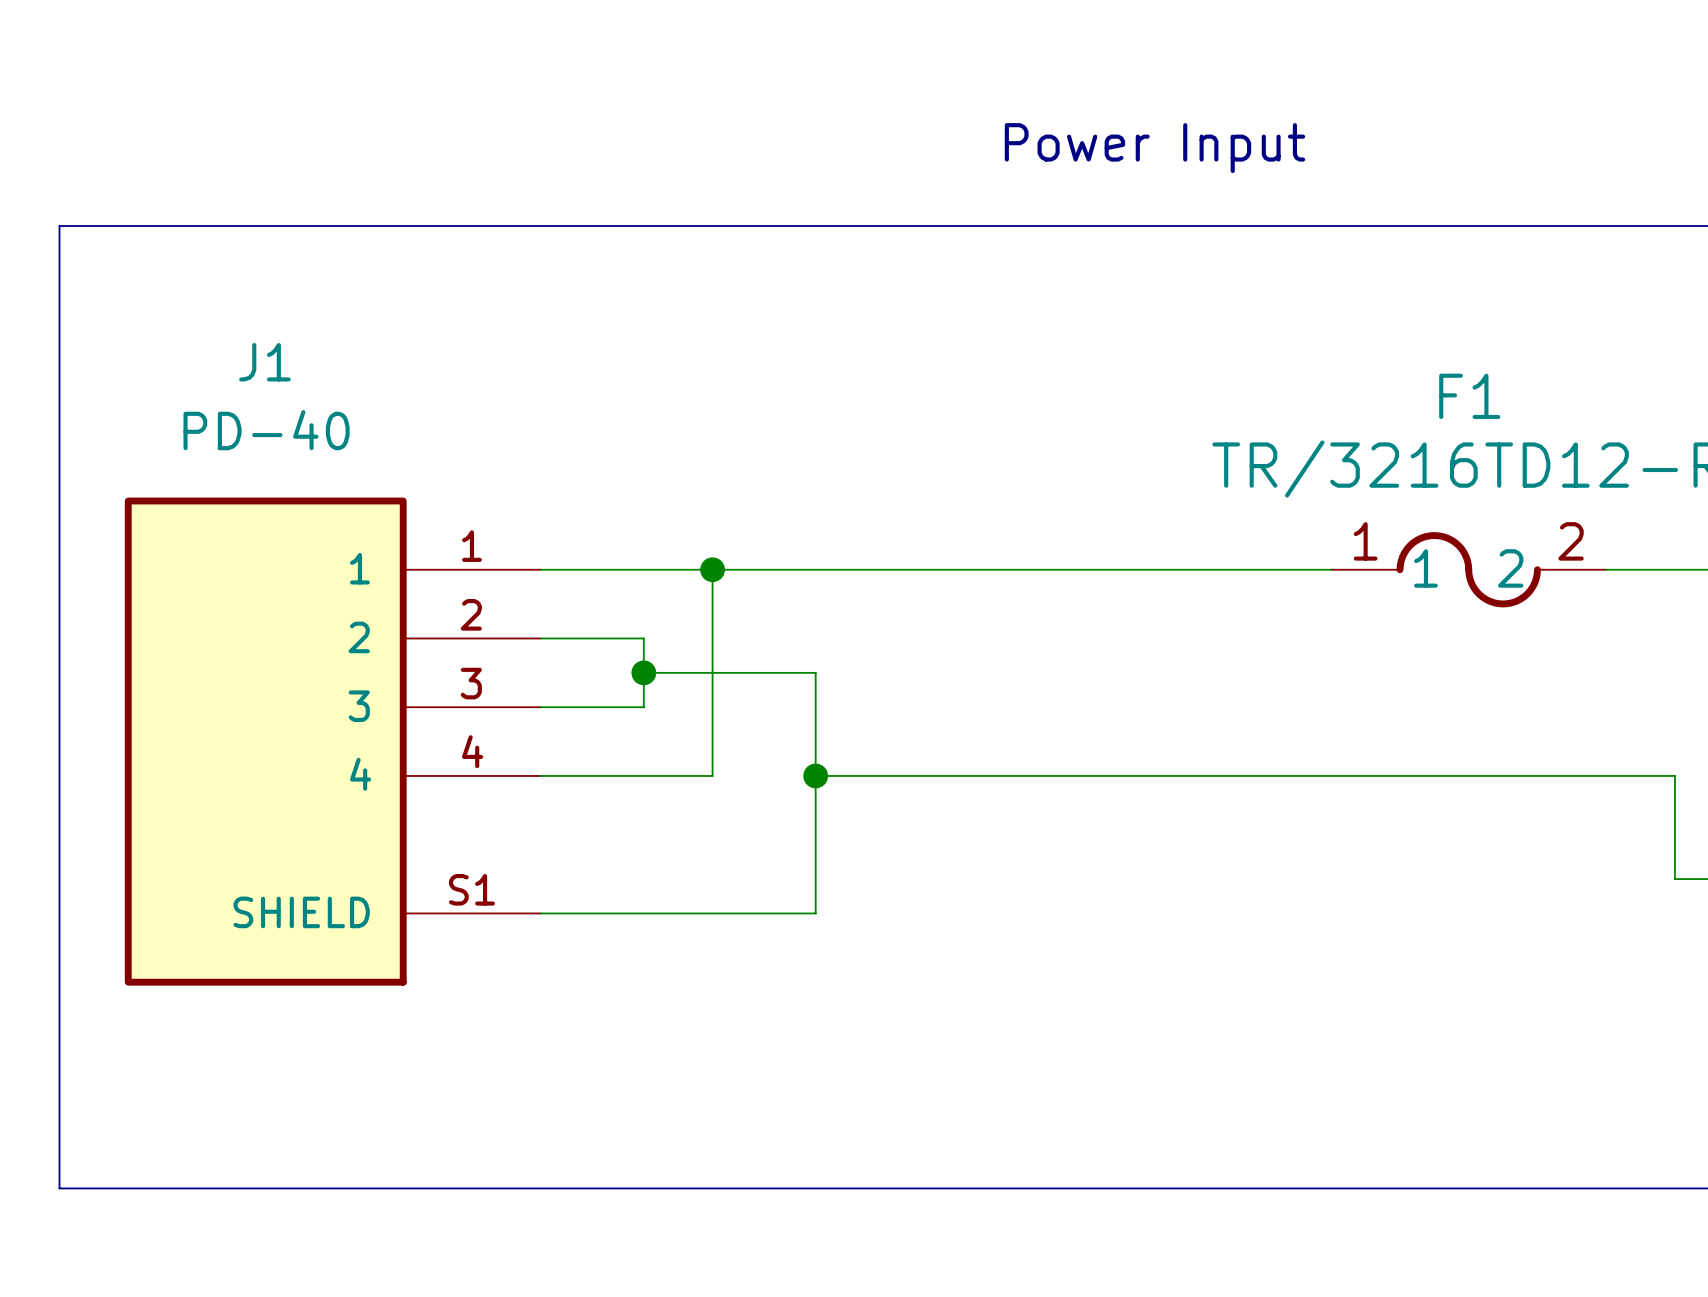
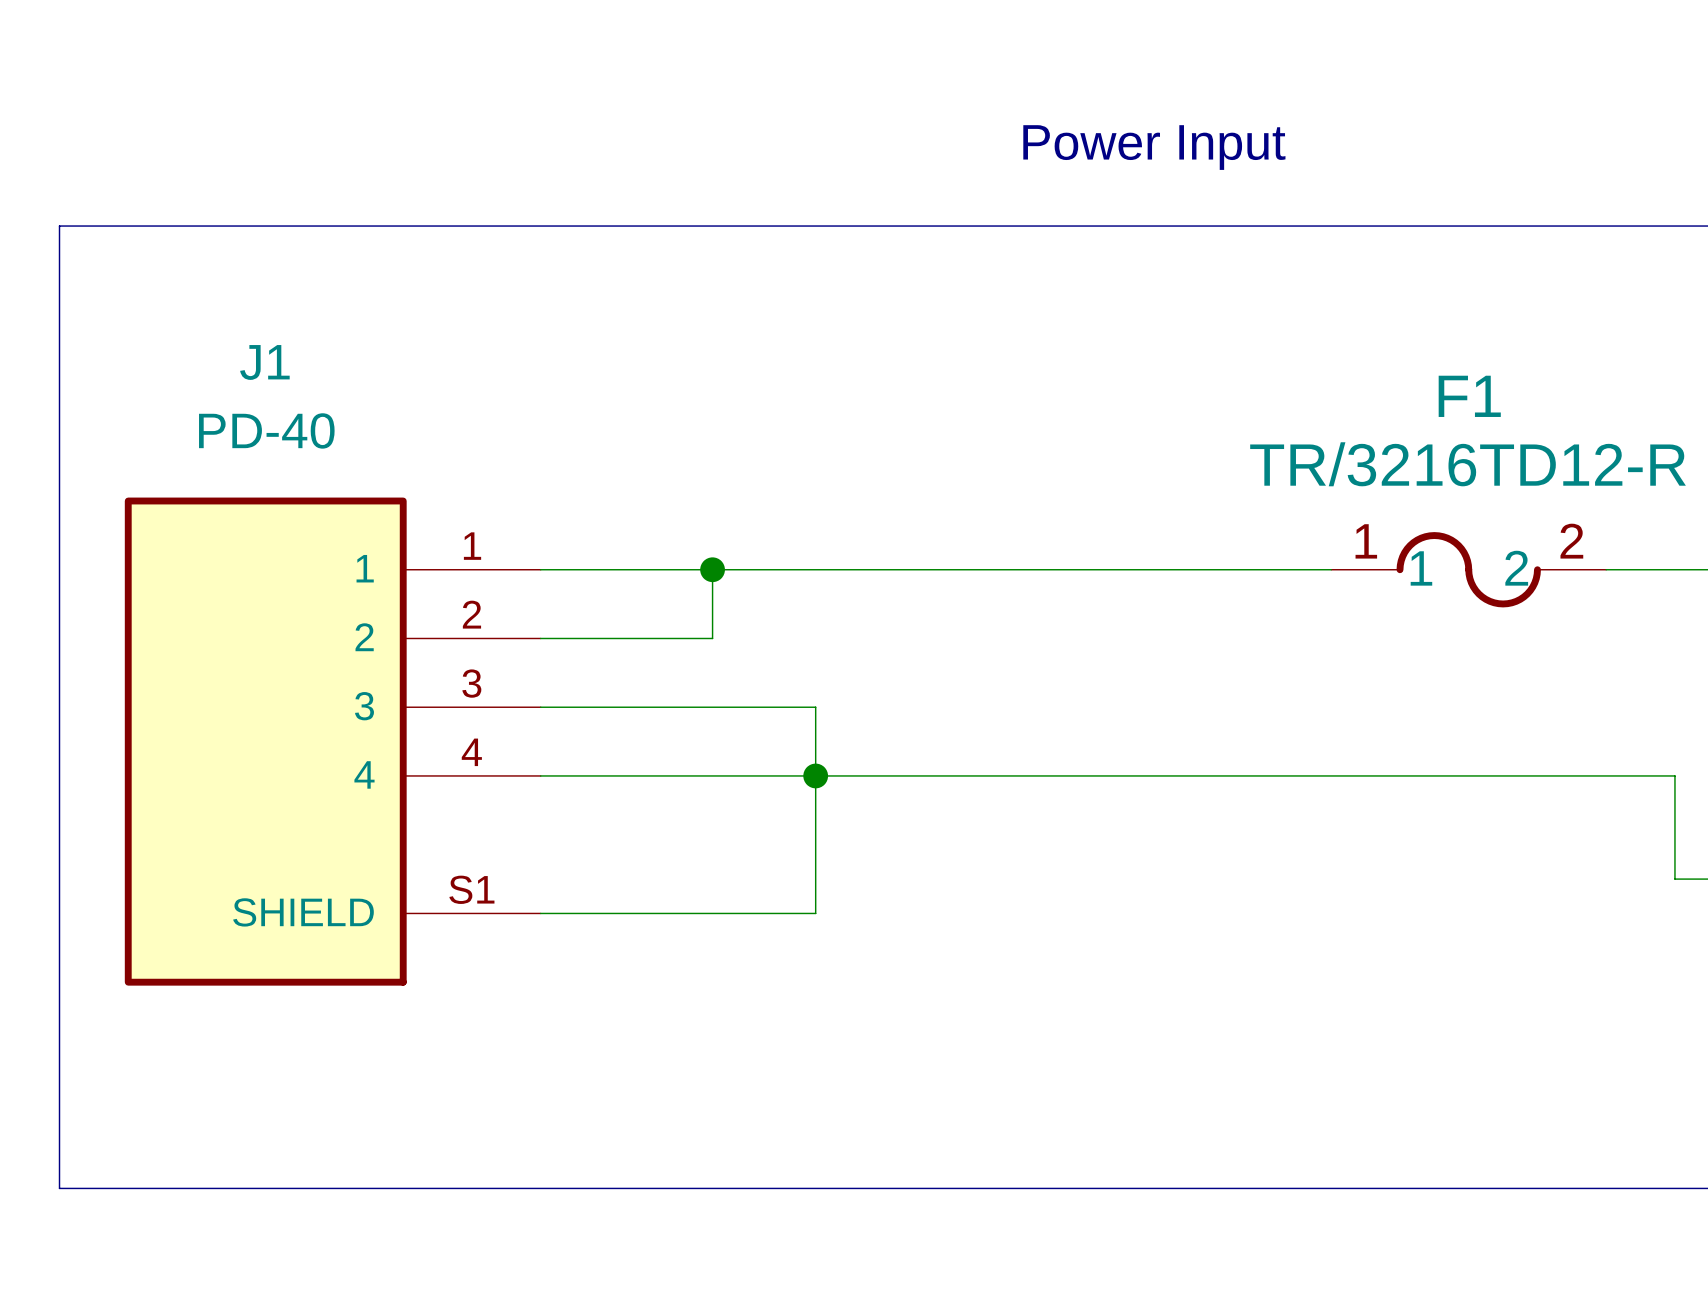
wire: (643, 638) (643, 707) -> (643, 638) (712, 638)
wire: (712, 638) (712, 775) -> (815, 775) (712, 775)
wire: (643, 672) (815, 672) (815, 707) -> (643, 707) (815, 707)
junction: (643, 672) -> none

